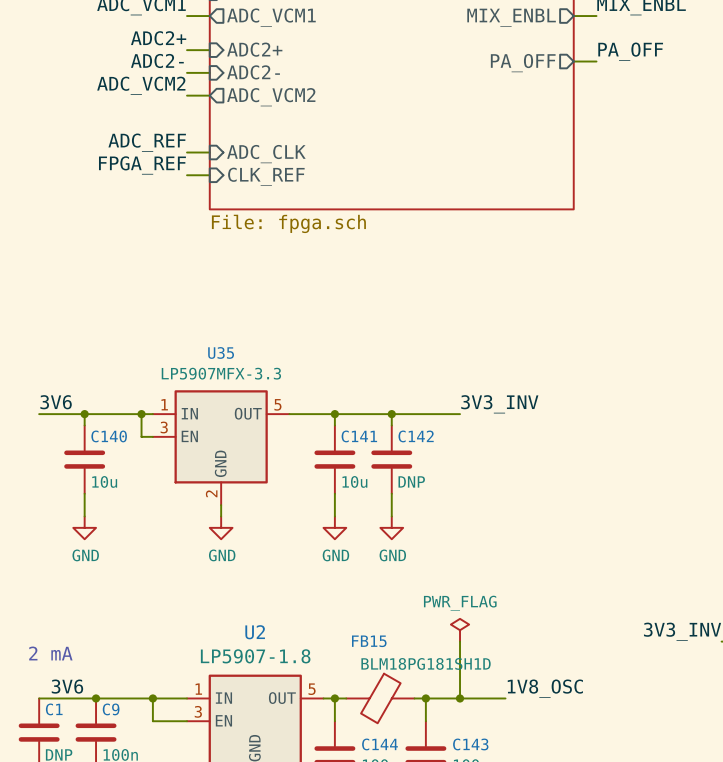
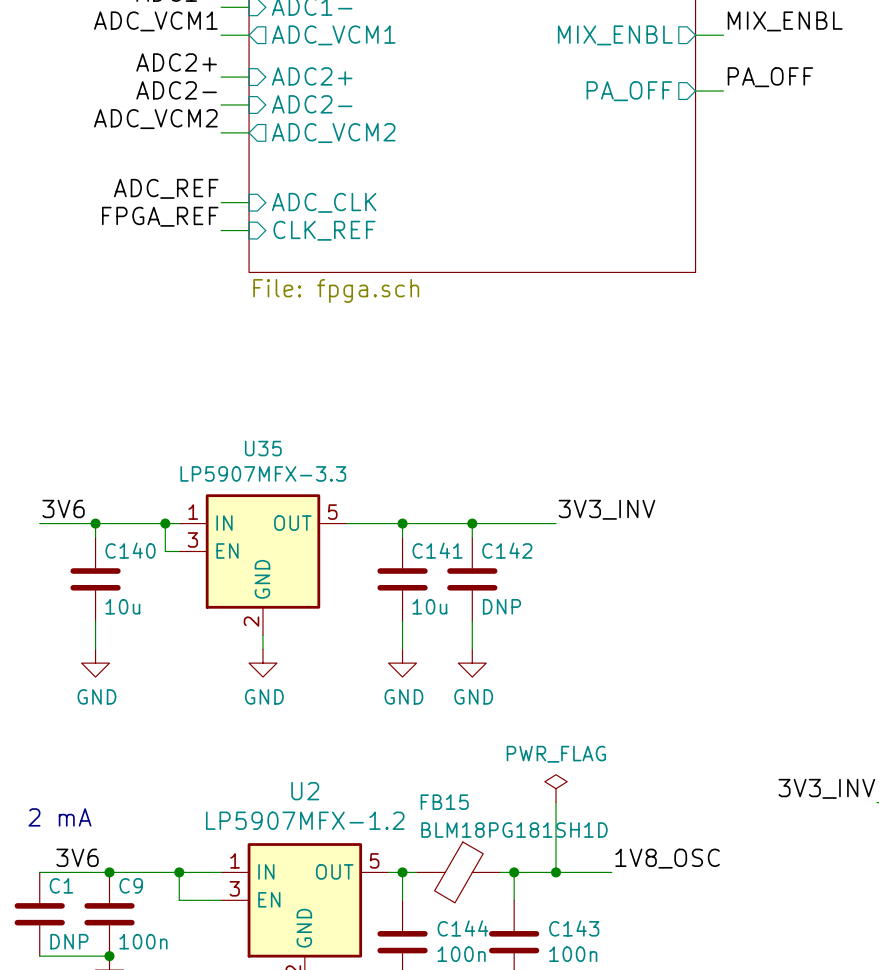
U2 value: LP5907-1.8 (255, 656) -> LP5907MFX-1.2 (305, 820)

